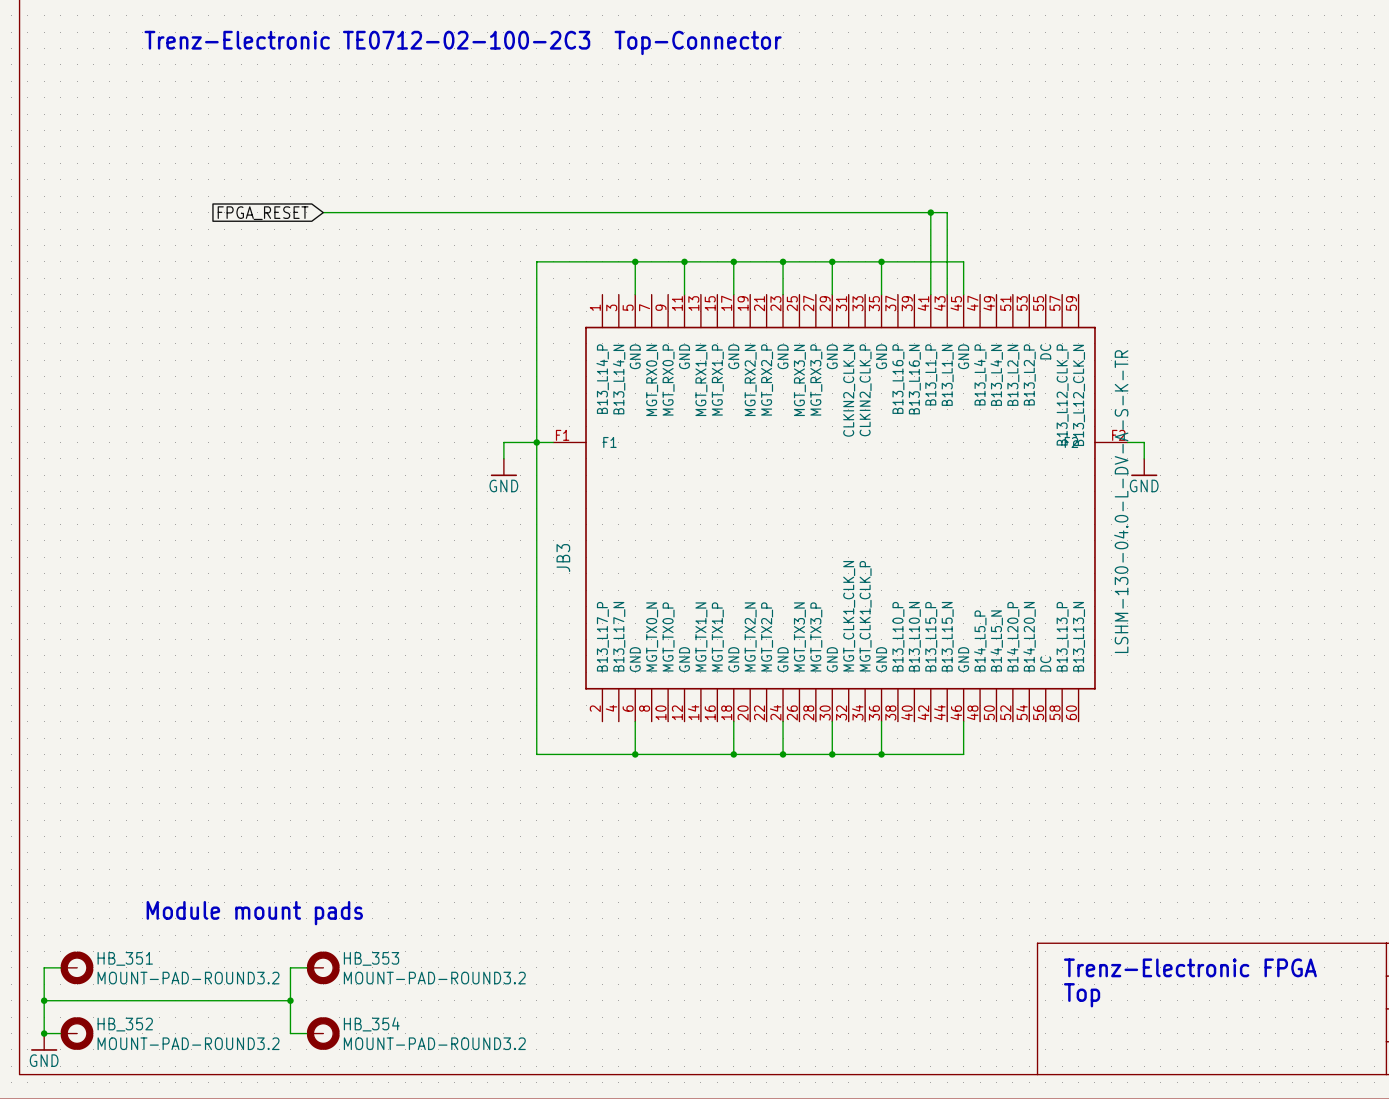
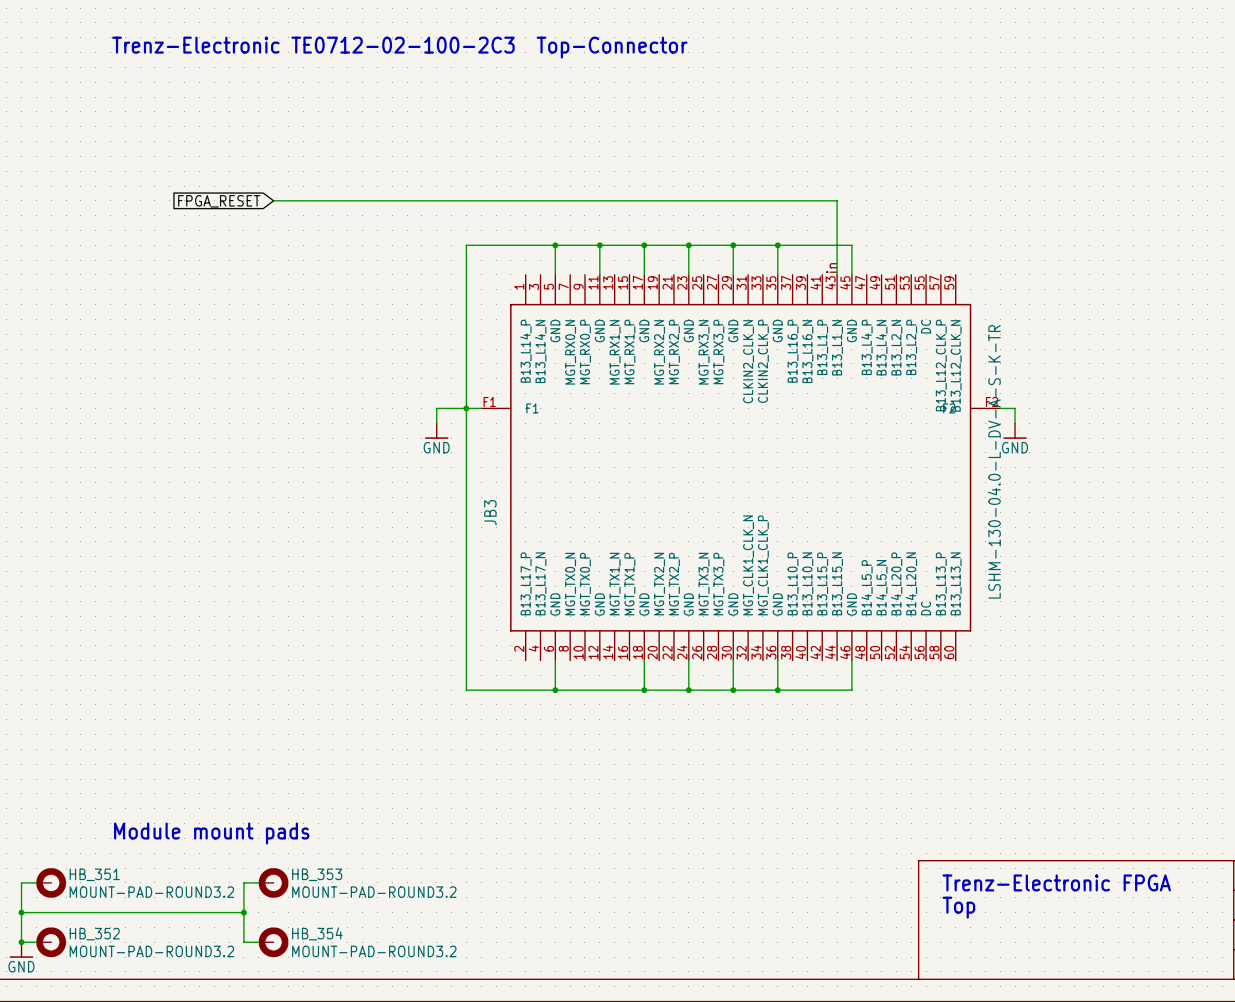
wire: (930, 212) (930, 294) -> none
junction: (930, 212) -> none
text: none -> in (831, 268)

